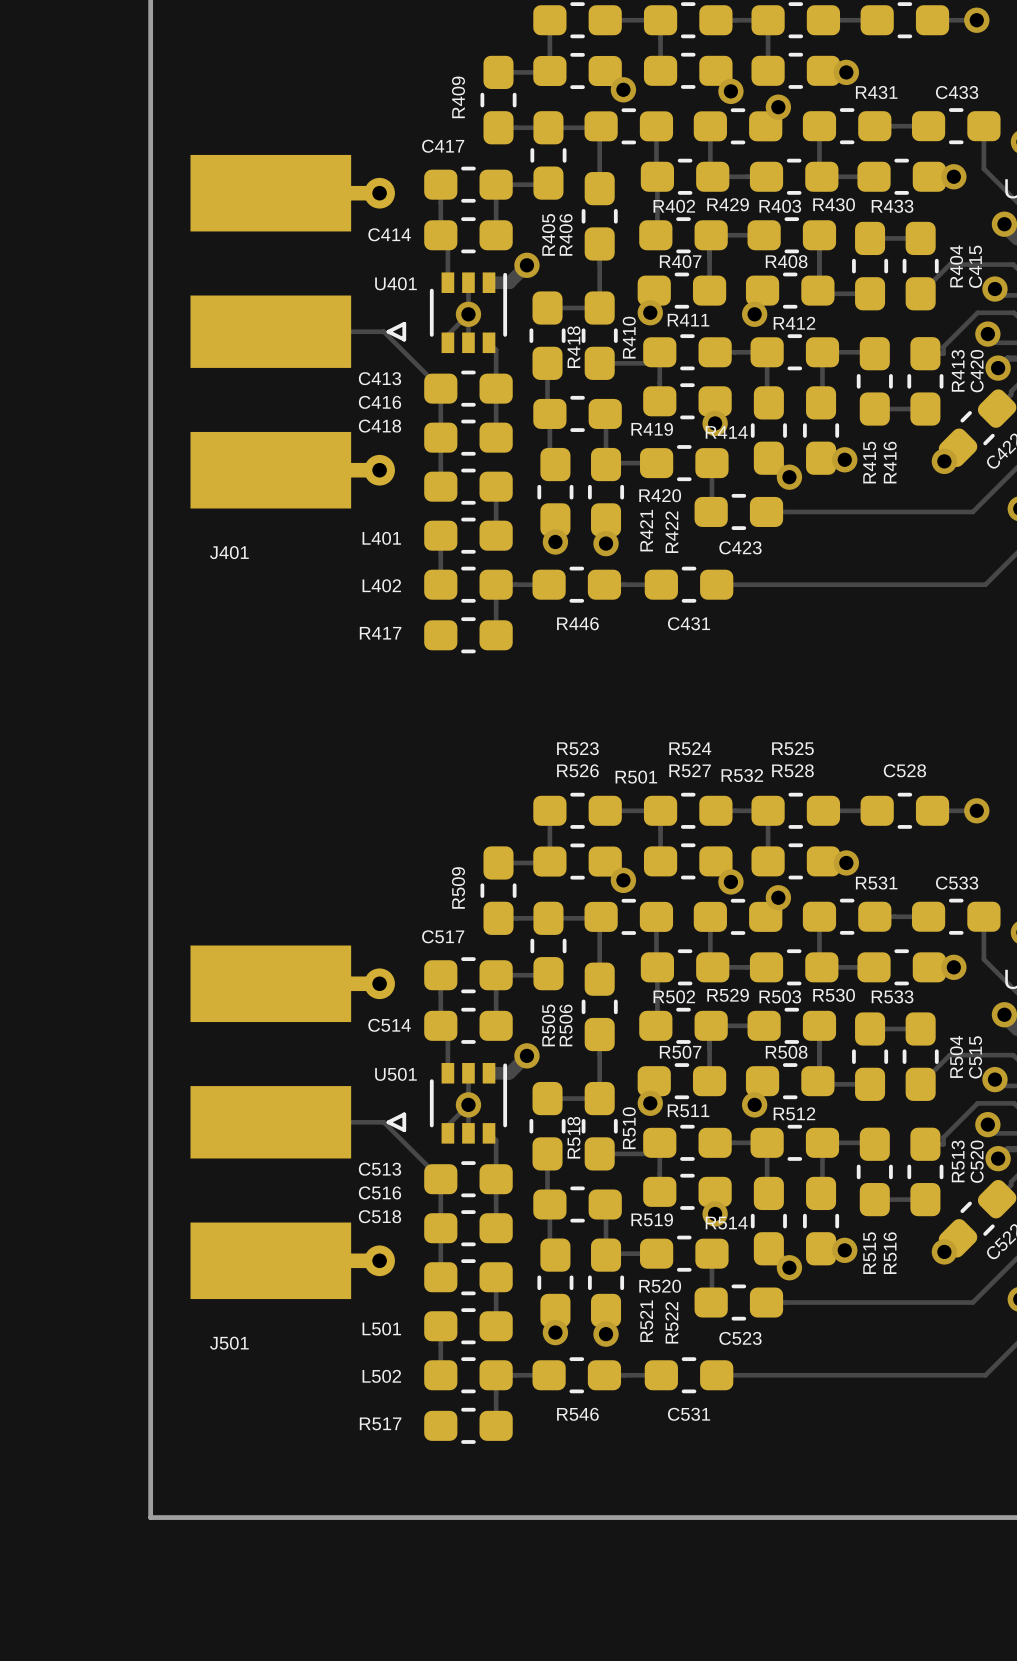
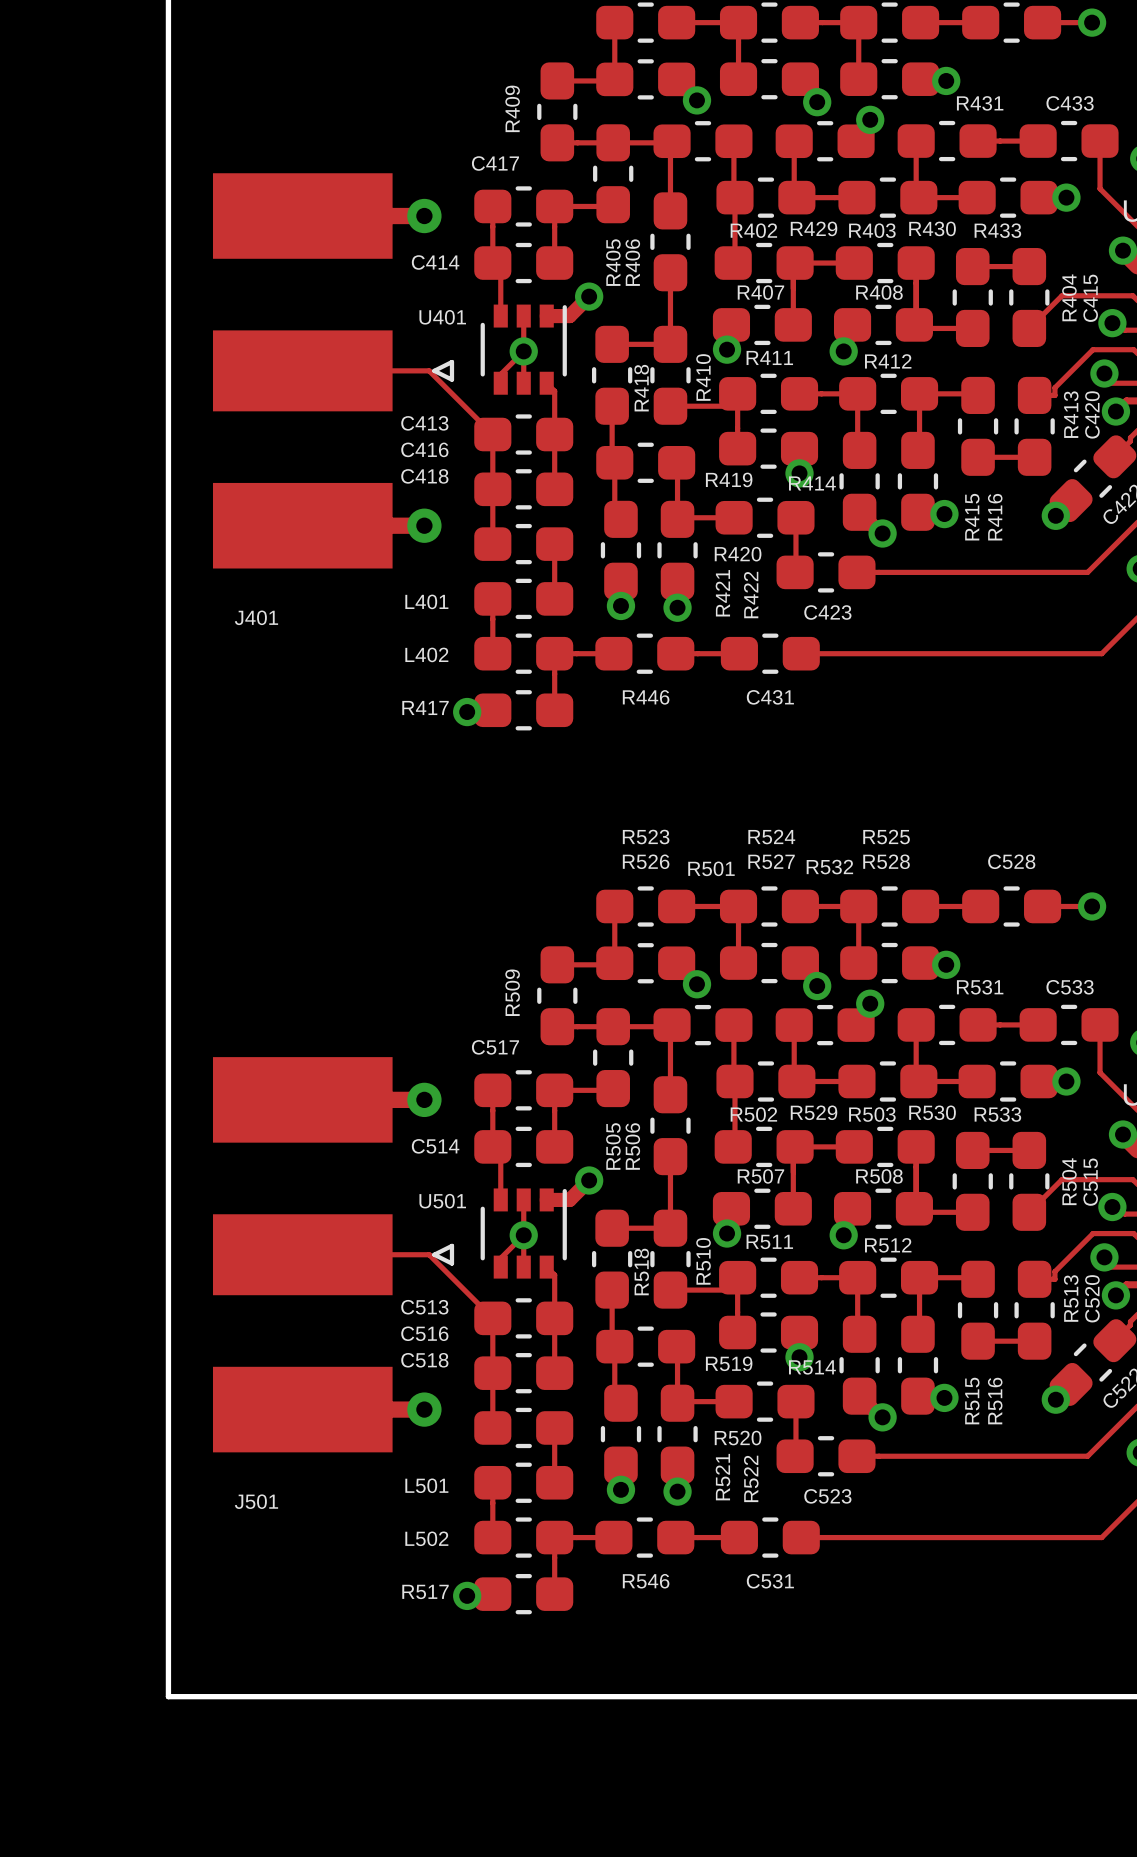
via: none -> (467, 712)
via: none -> (467, 1595)

